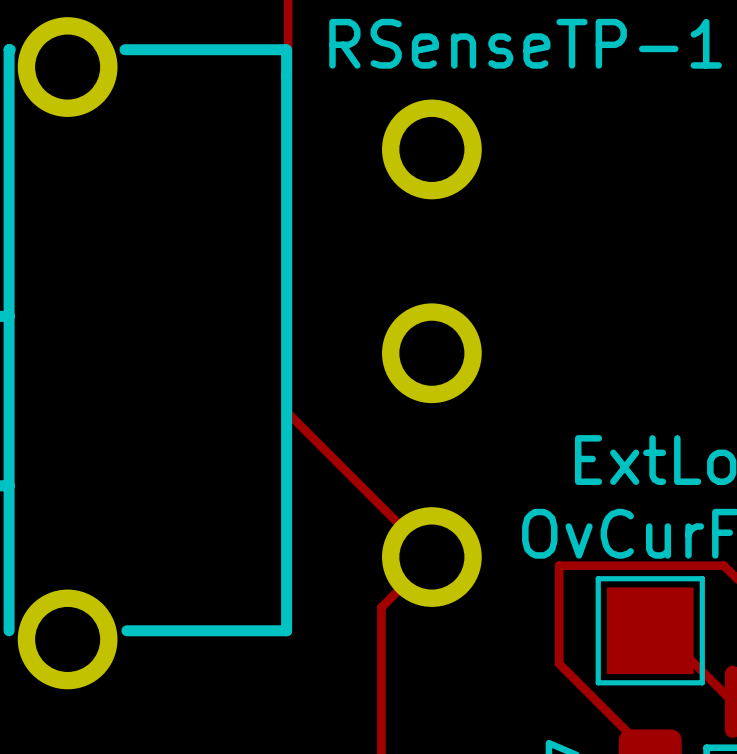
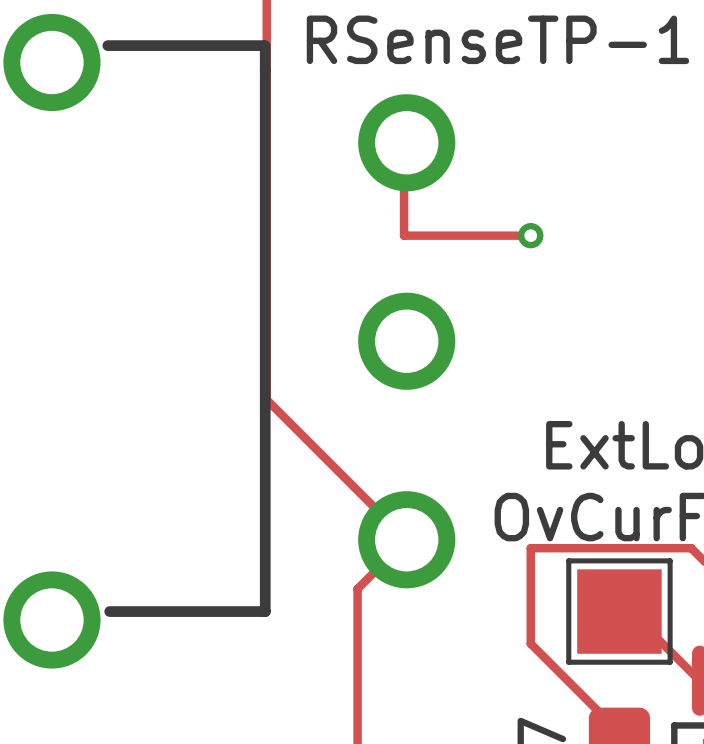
track: none -> (406, 142) (404, 145) (404, 235) (530, 235)
via: none -> (530, 235)

